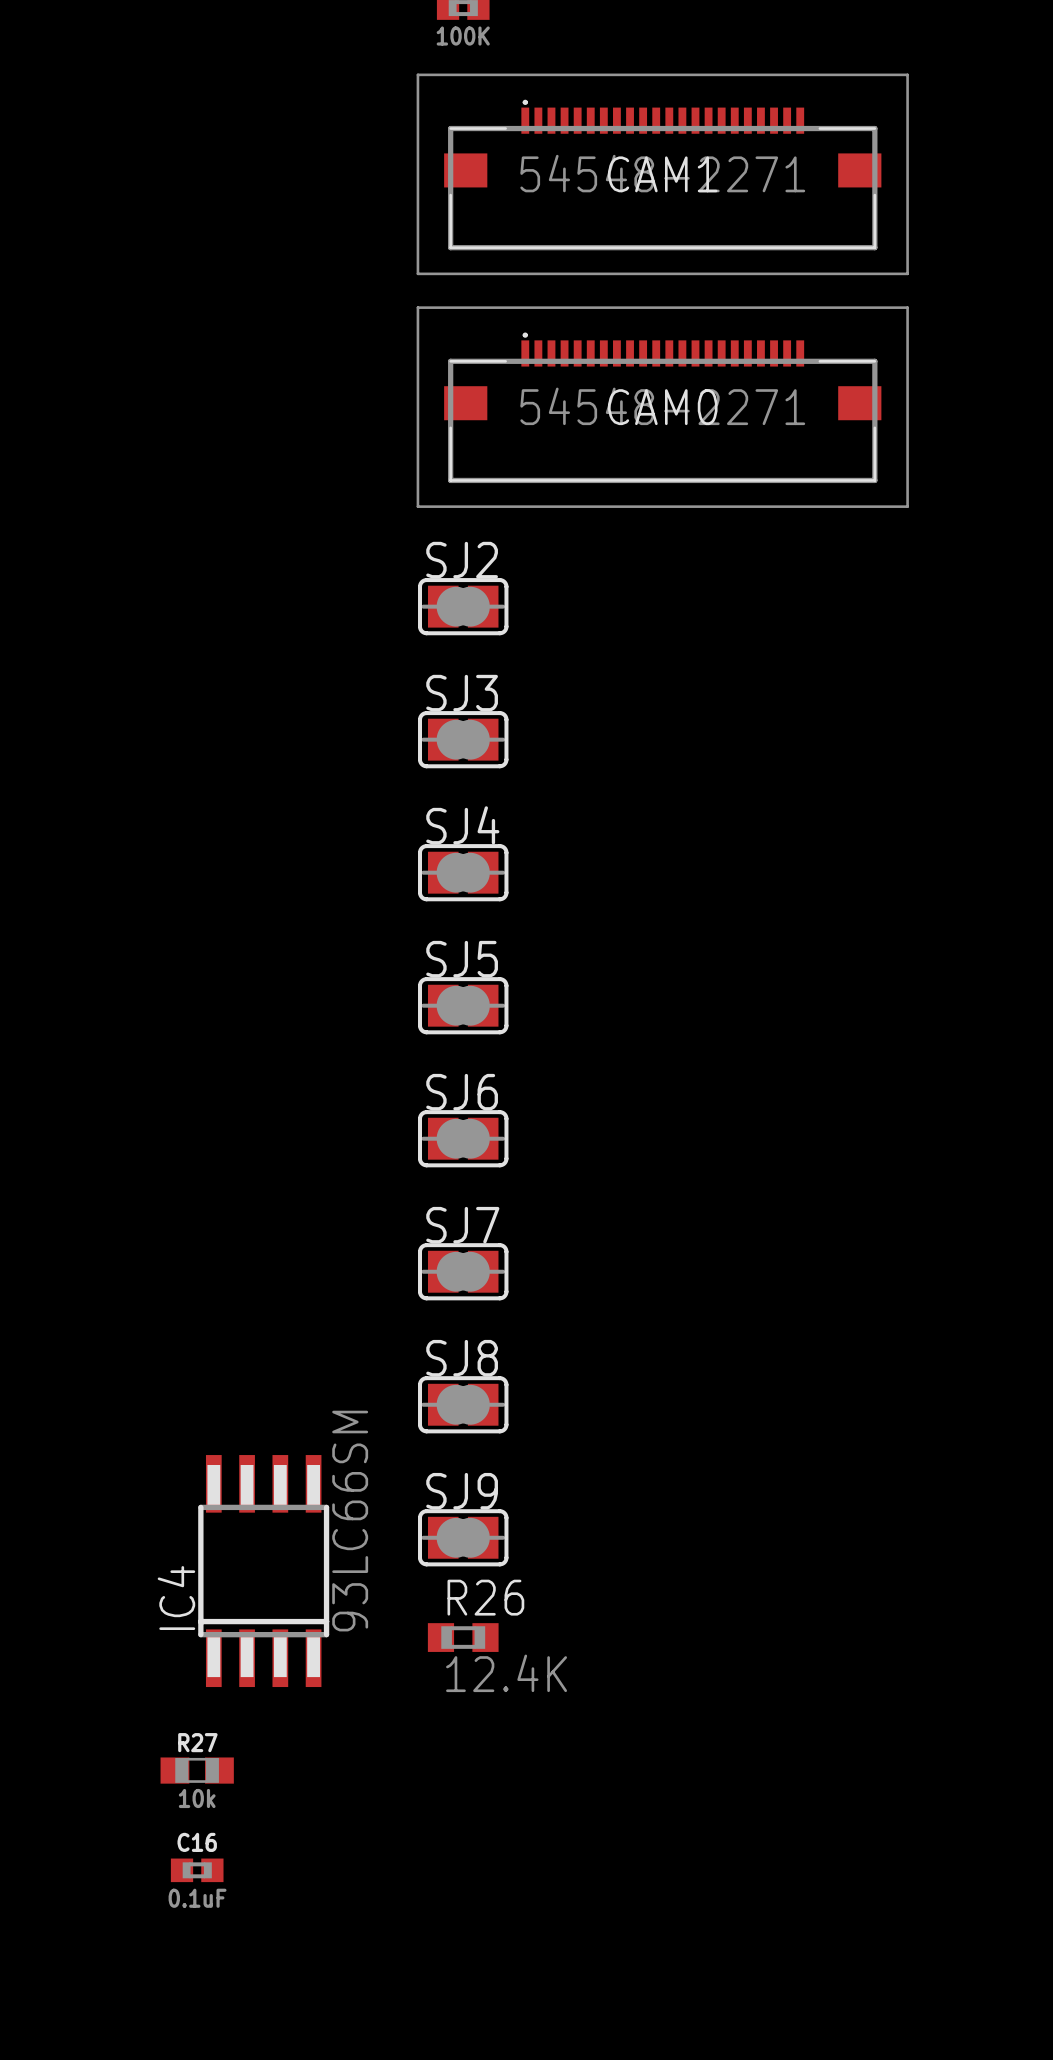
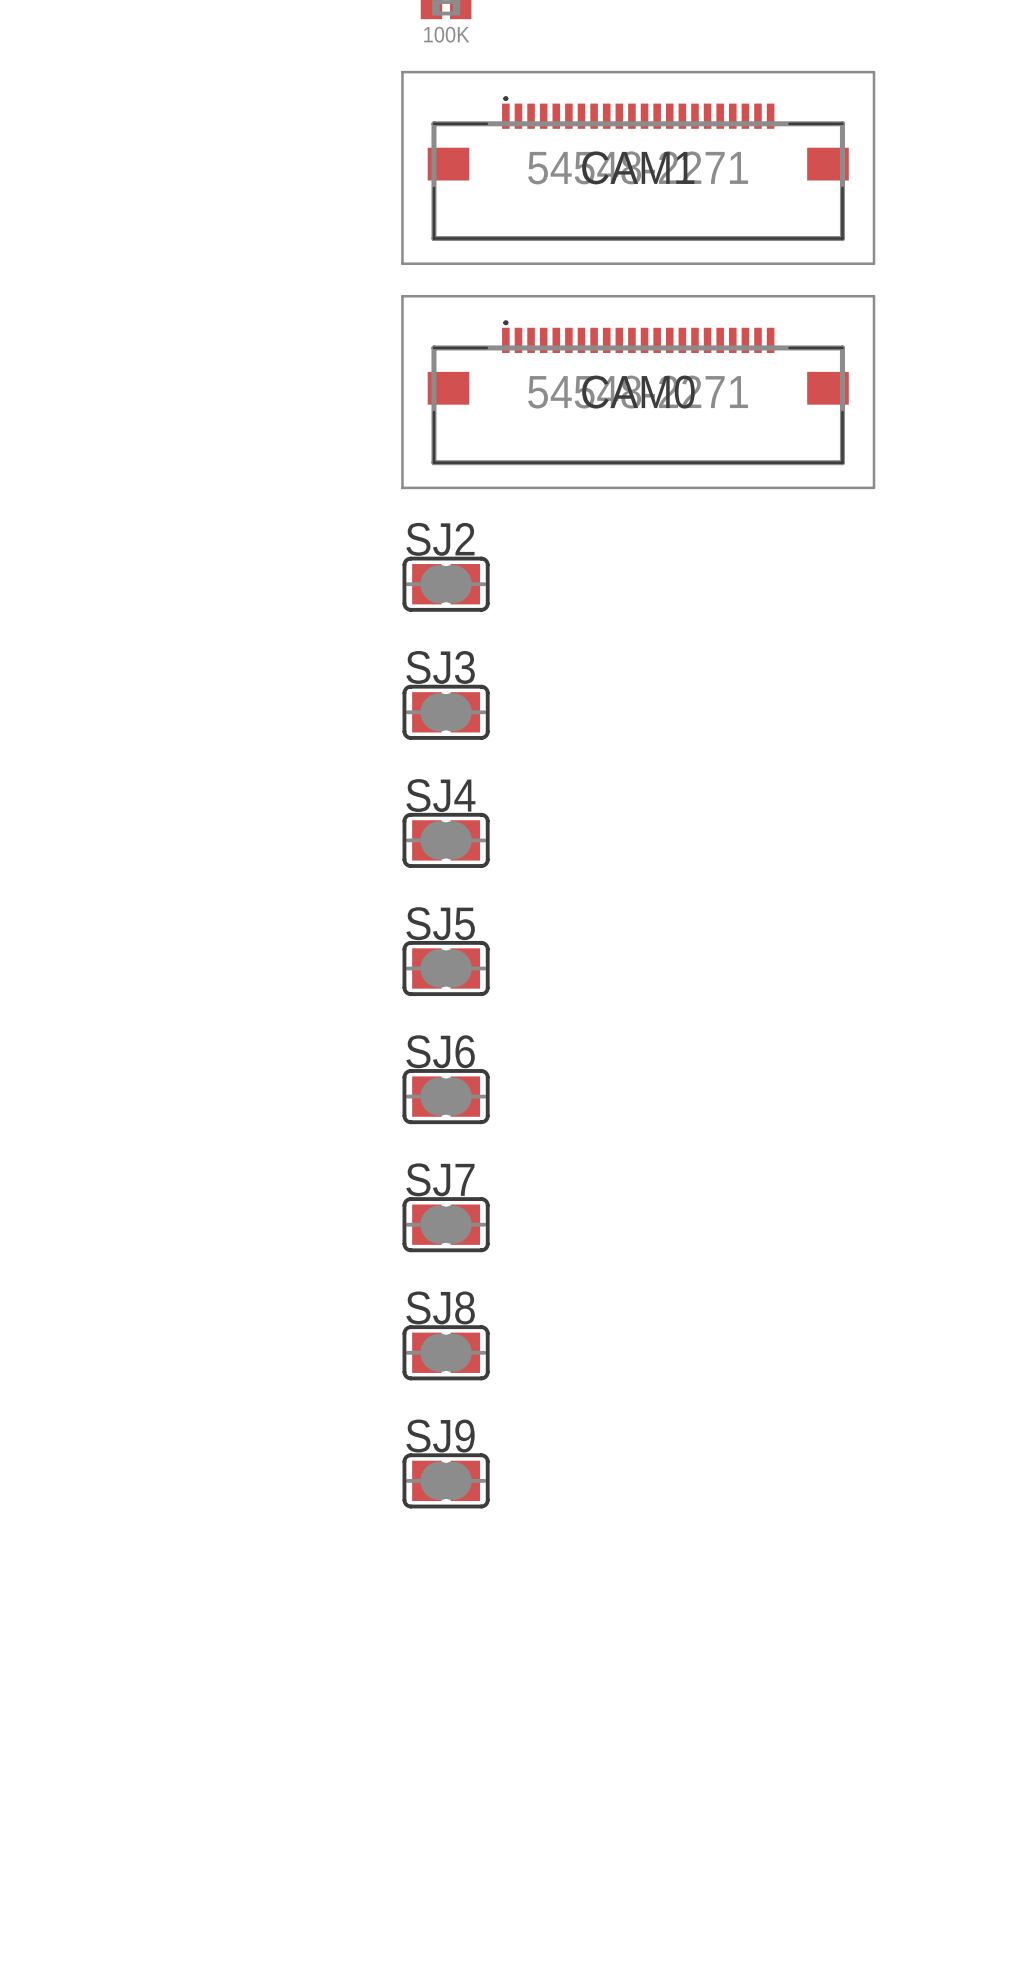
IC4: 93LC66SM (263, 1571) -> none
R26: 12.4K (463, 1637) -> none
R27: 10k (197, 1770) -> none
C16: 0.1uF (197, 1870) -> none

